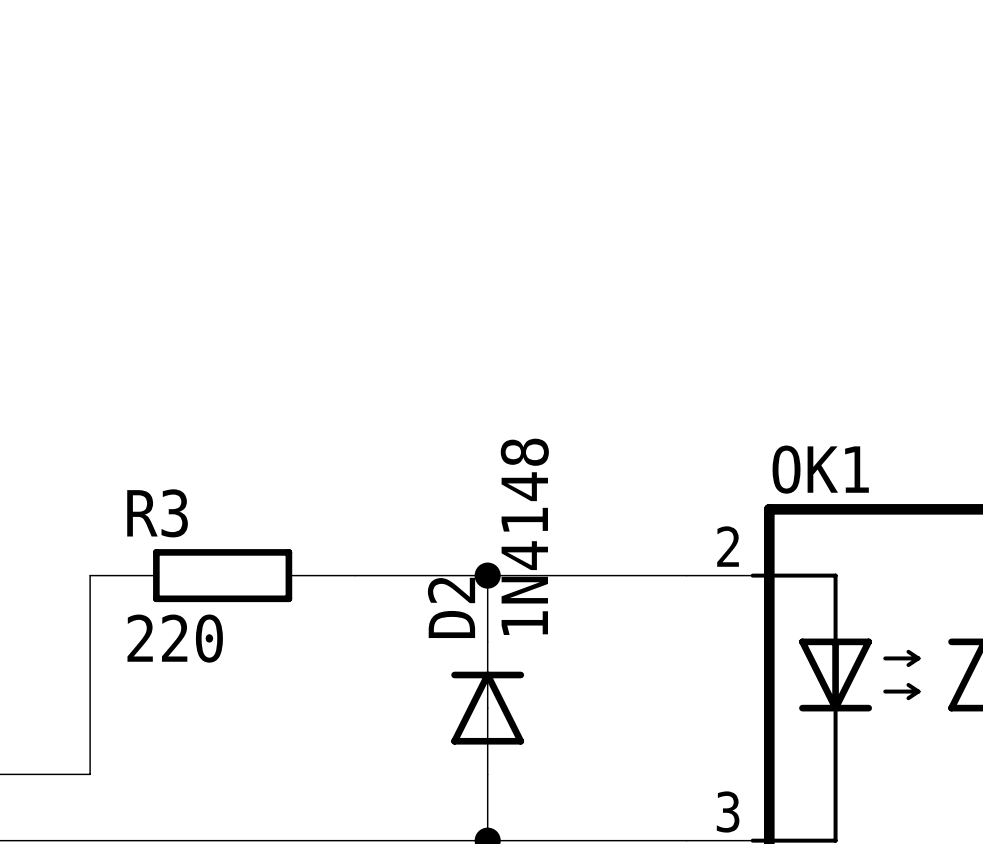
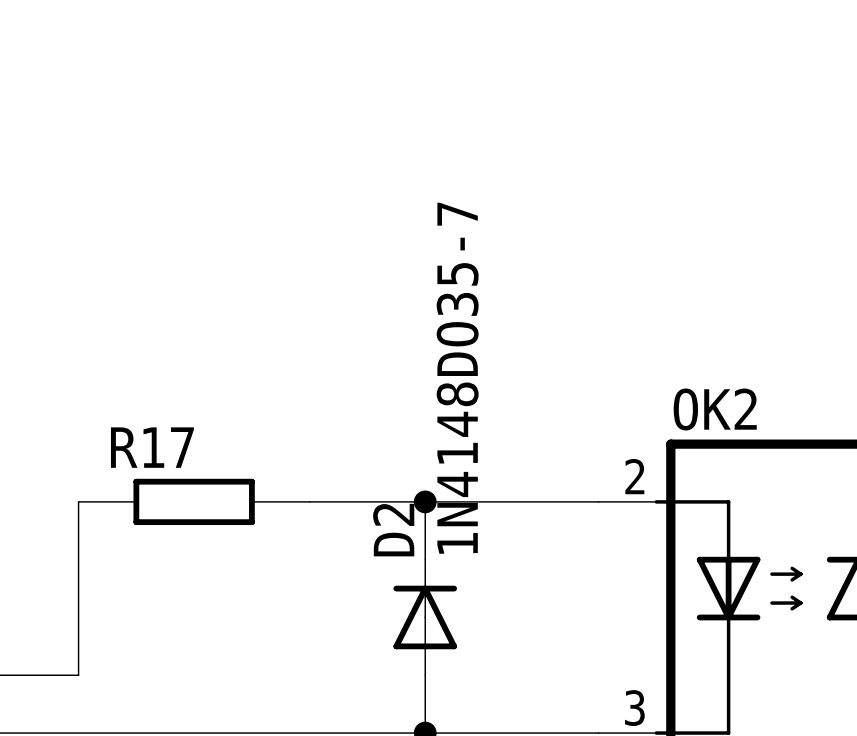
OK1 name: OK1 (820, 469) -> OK2 (715, 409)
R3 name: R3 (157, 513) -> R17 (152, 447)
D2 value: 1N4148 (524, 536) -> 1N4148DO35-7 (457, 378)
R3 value: 220 (175, 638) -> none

